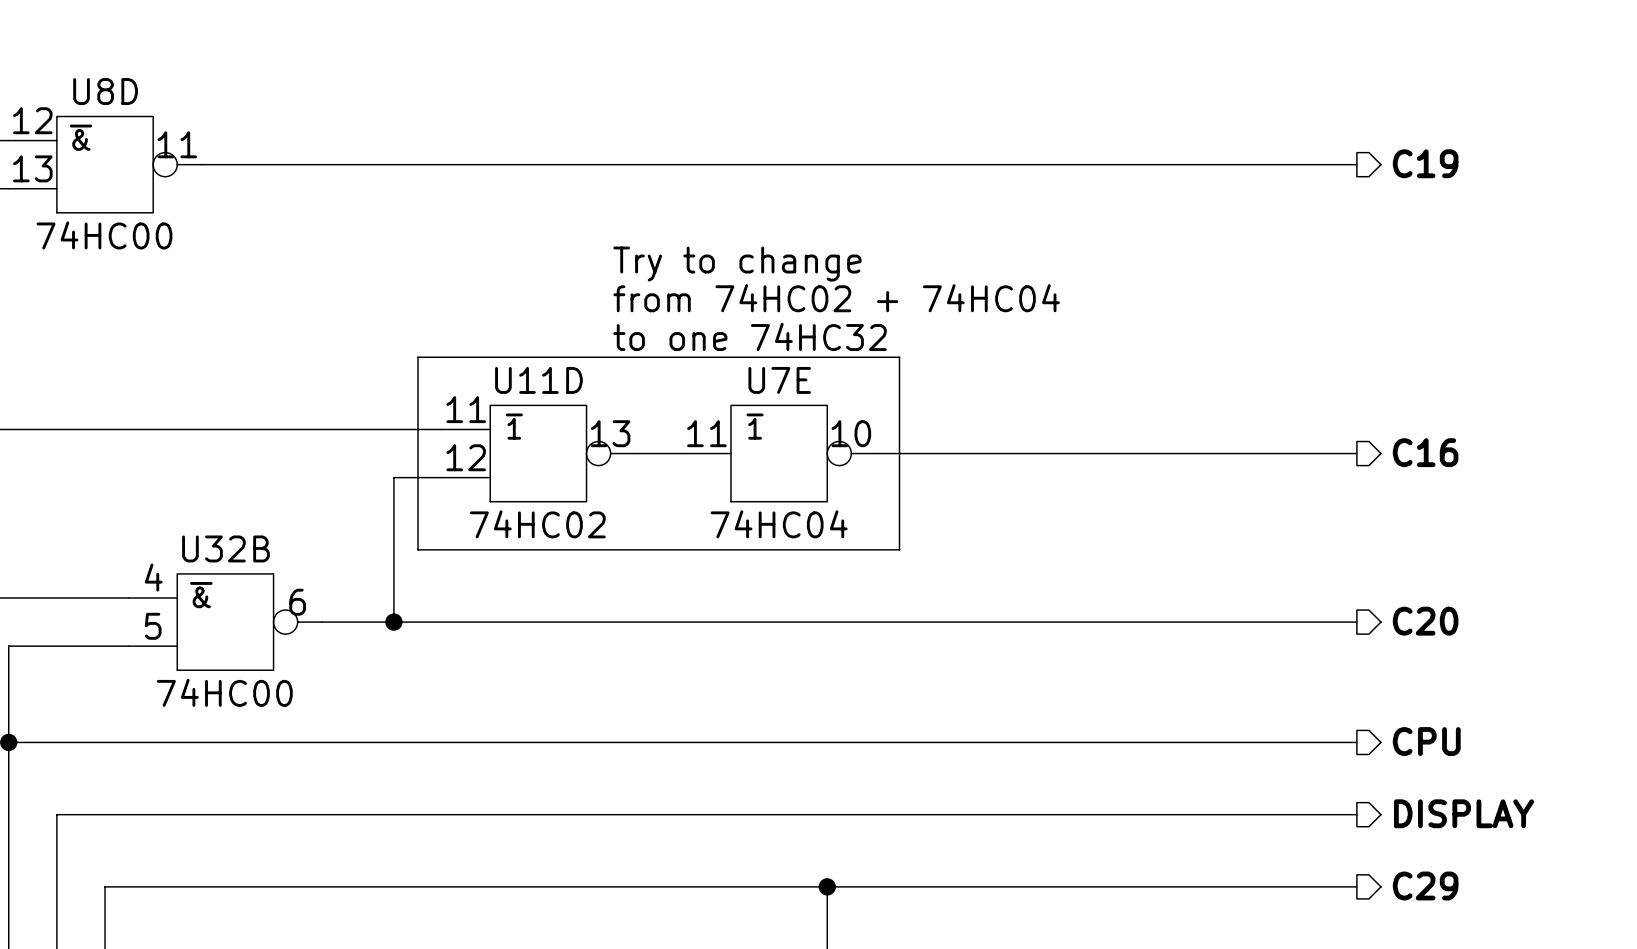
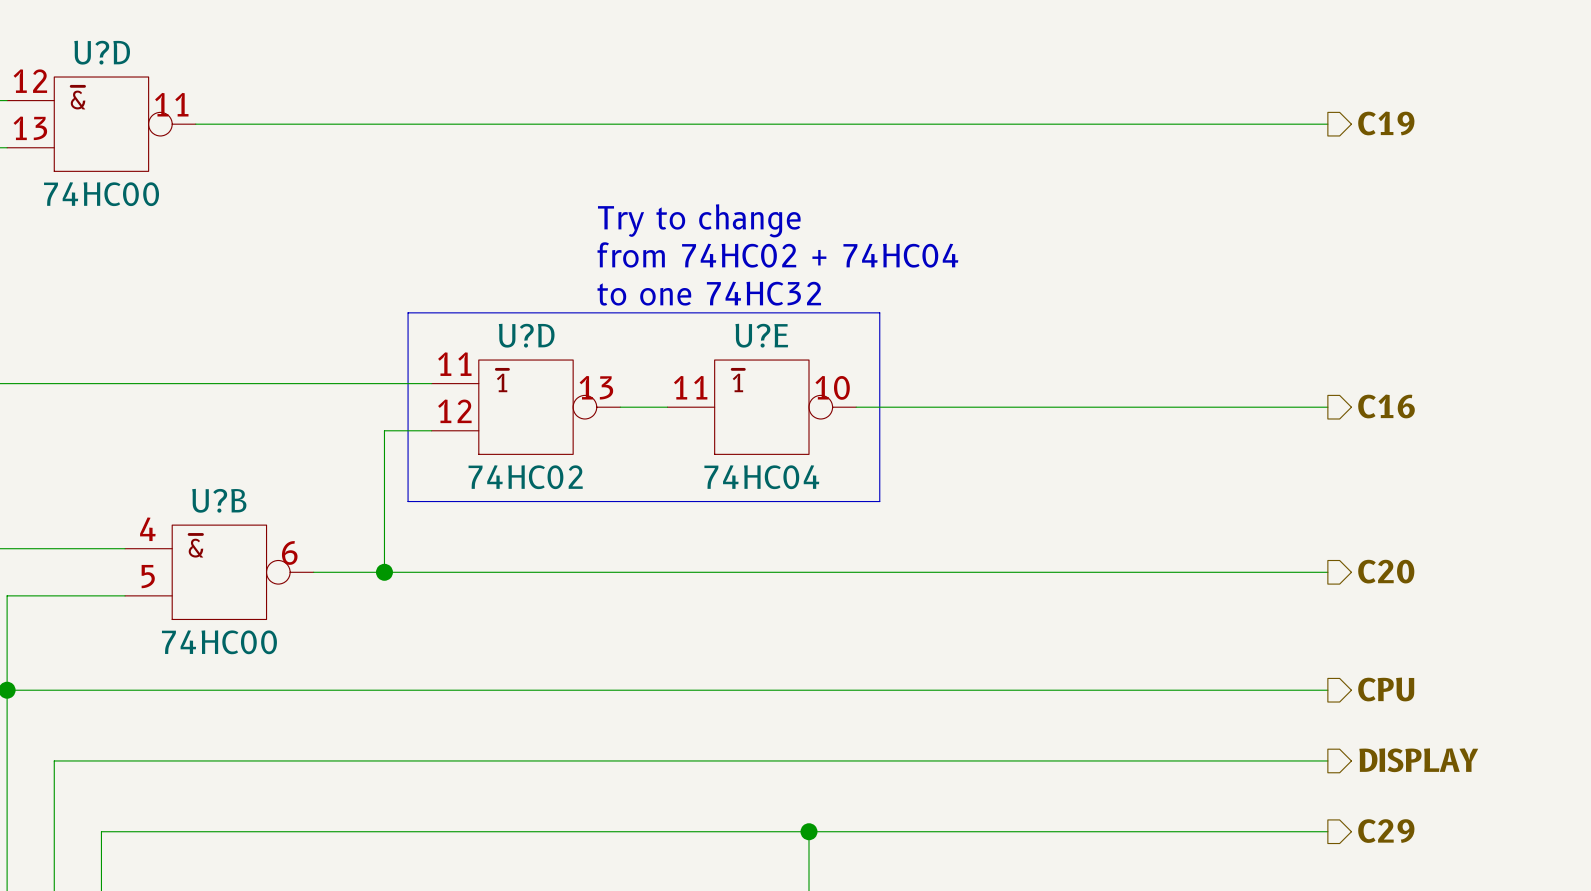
U8D name: U8D (105, 91) -> U?D (102, 52)
U11D name: U11D (538, 380) -> U?D (526, 335)
U7E name: U7E (779, 380) -> U?E (761, 335)
U32B name: U32B (225, 548) -> U?B (219, 500)

